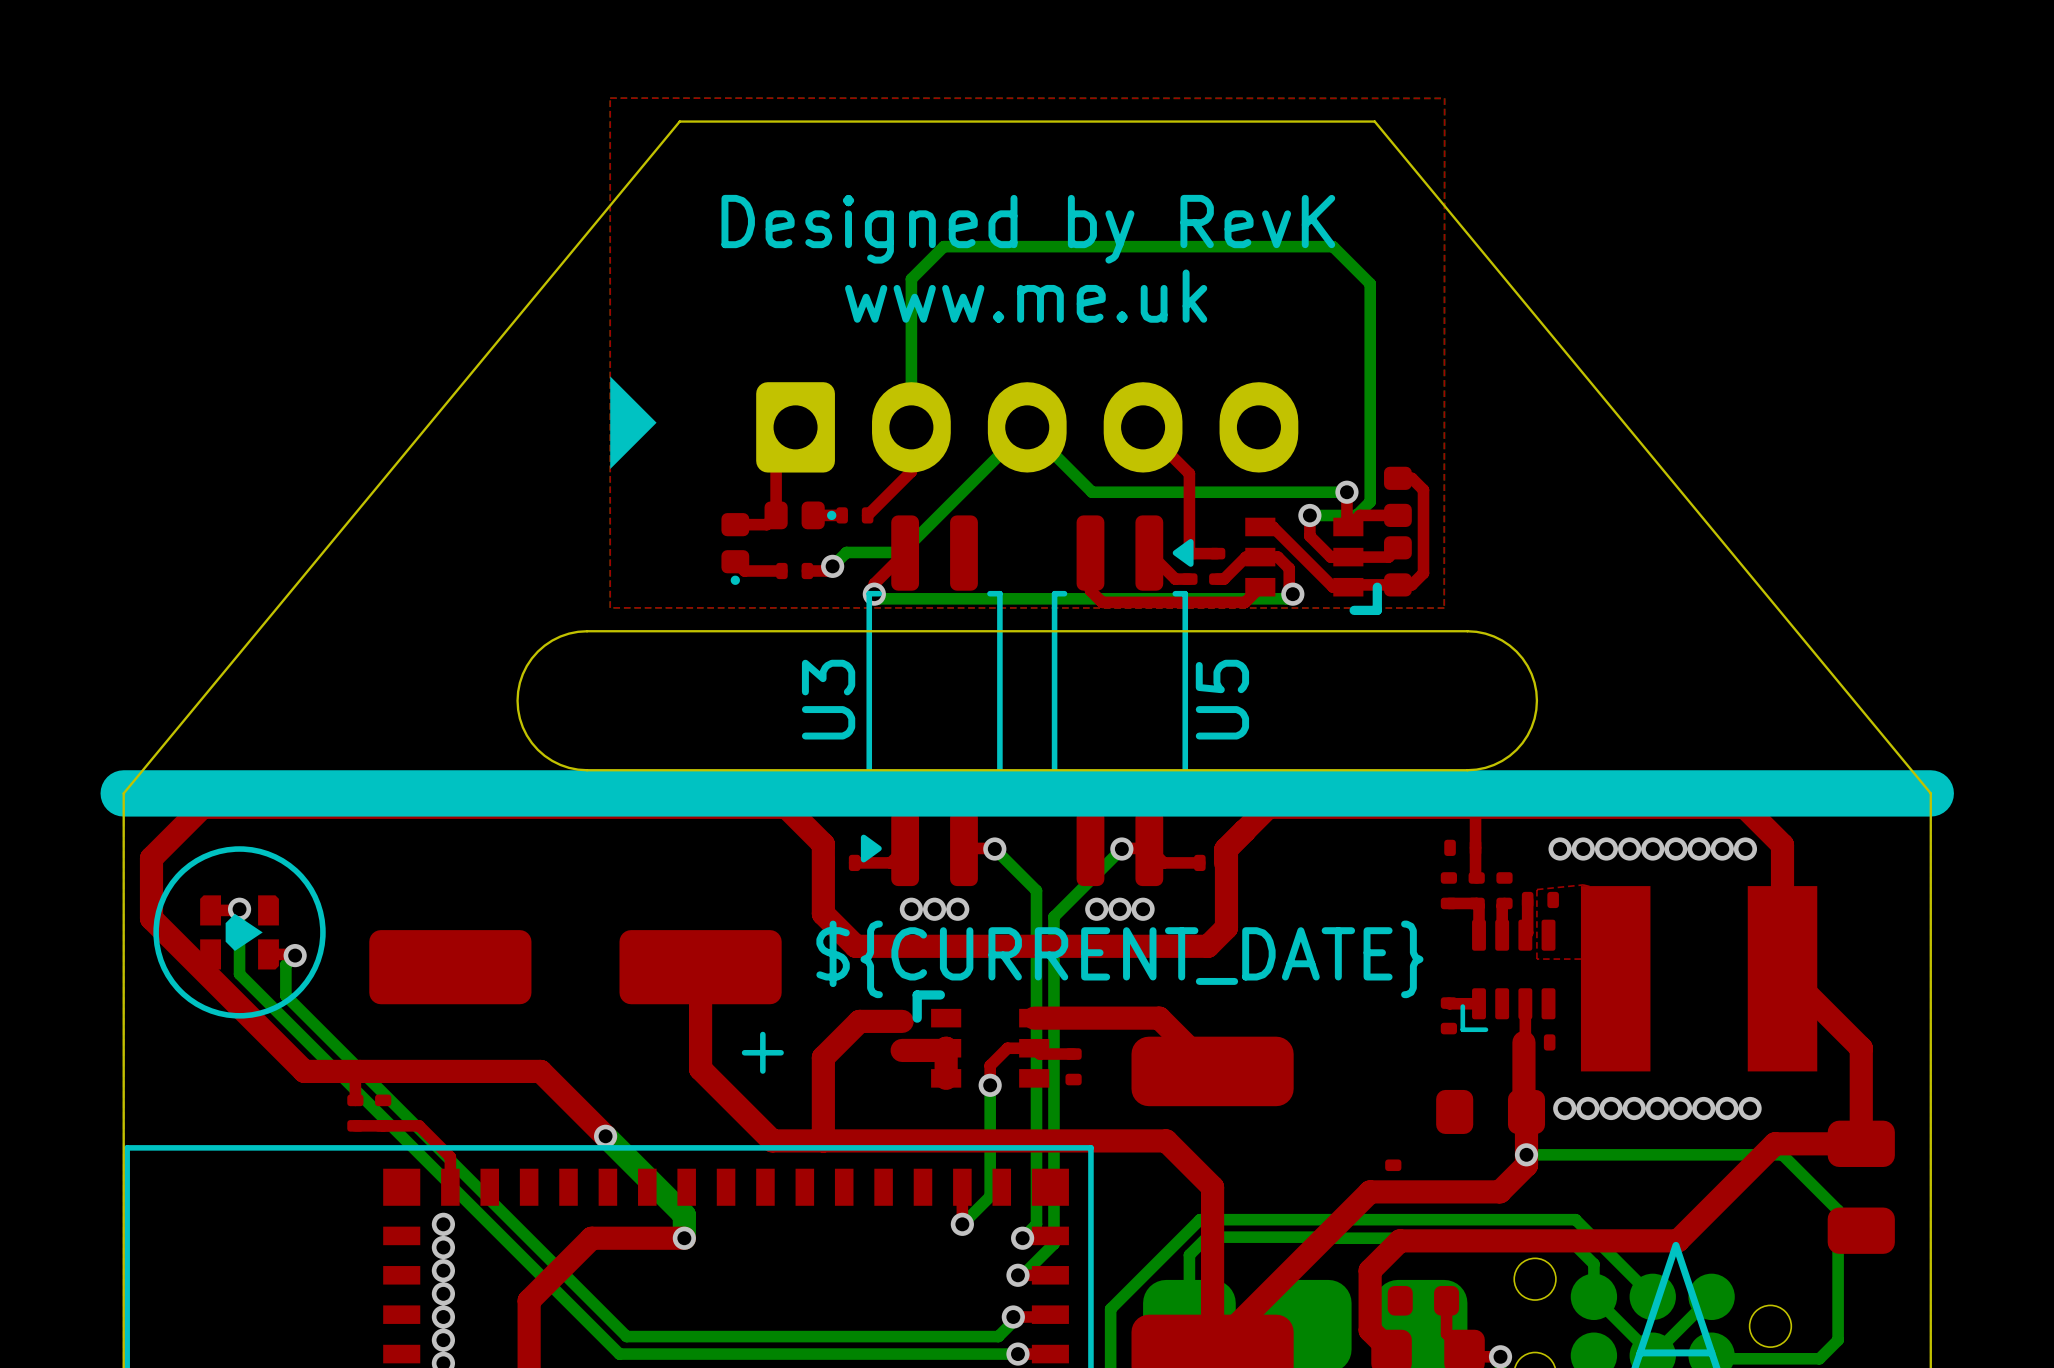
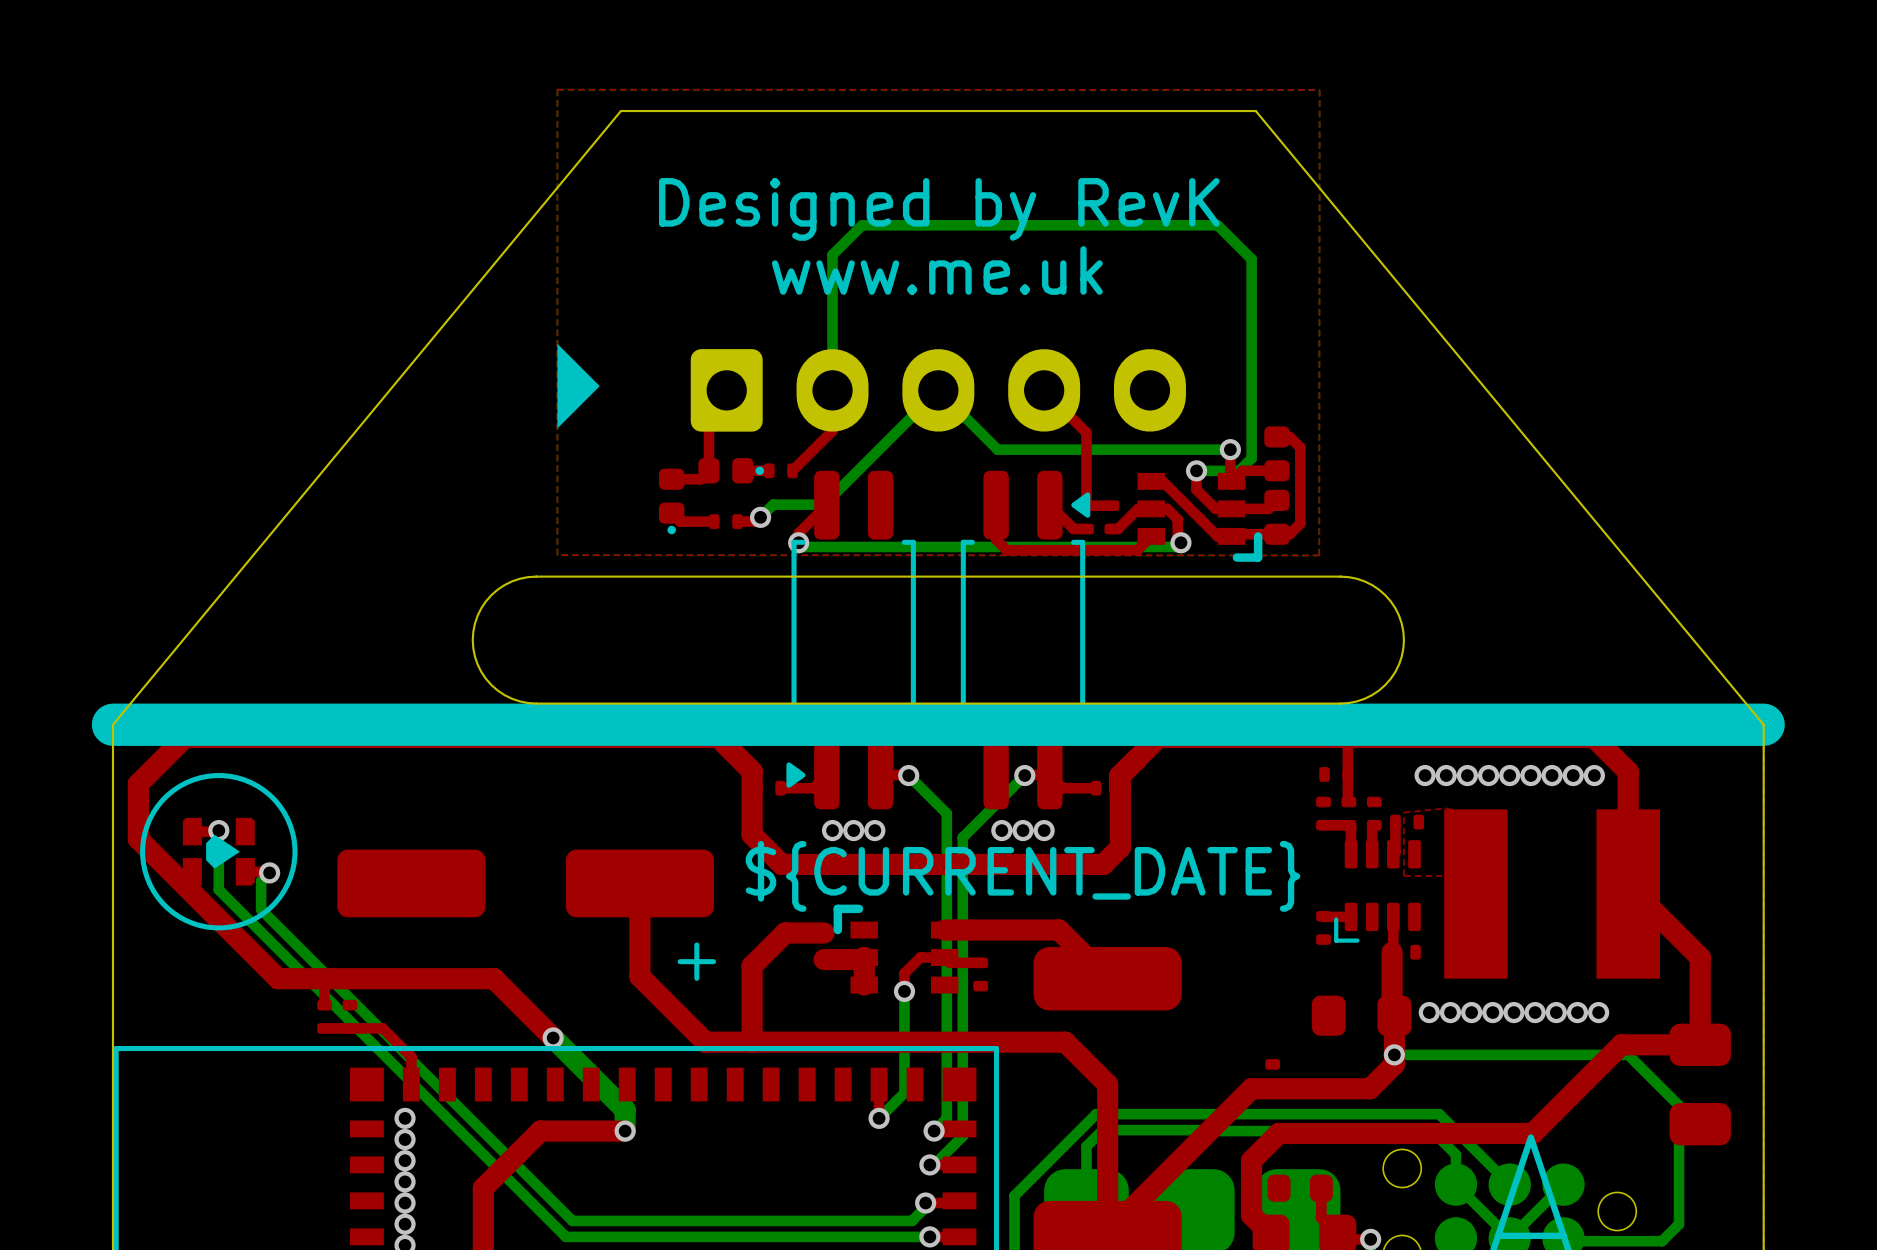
U3 name: U3 (828, 699) -> none
U5 name: U5 (1222, 699) -> none

